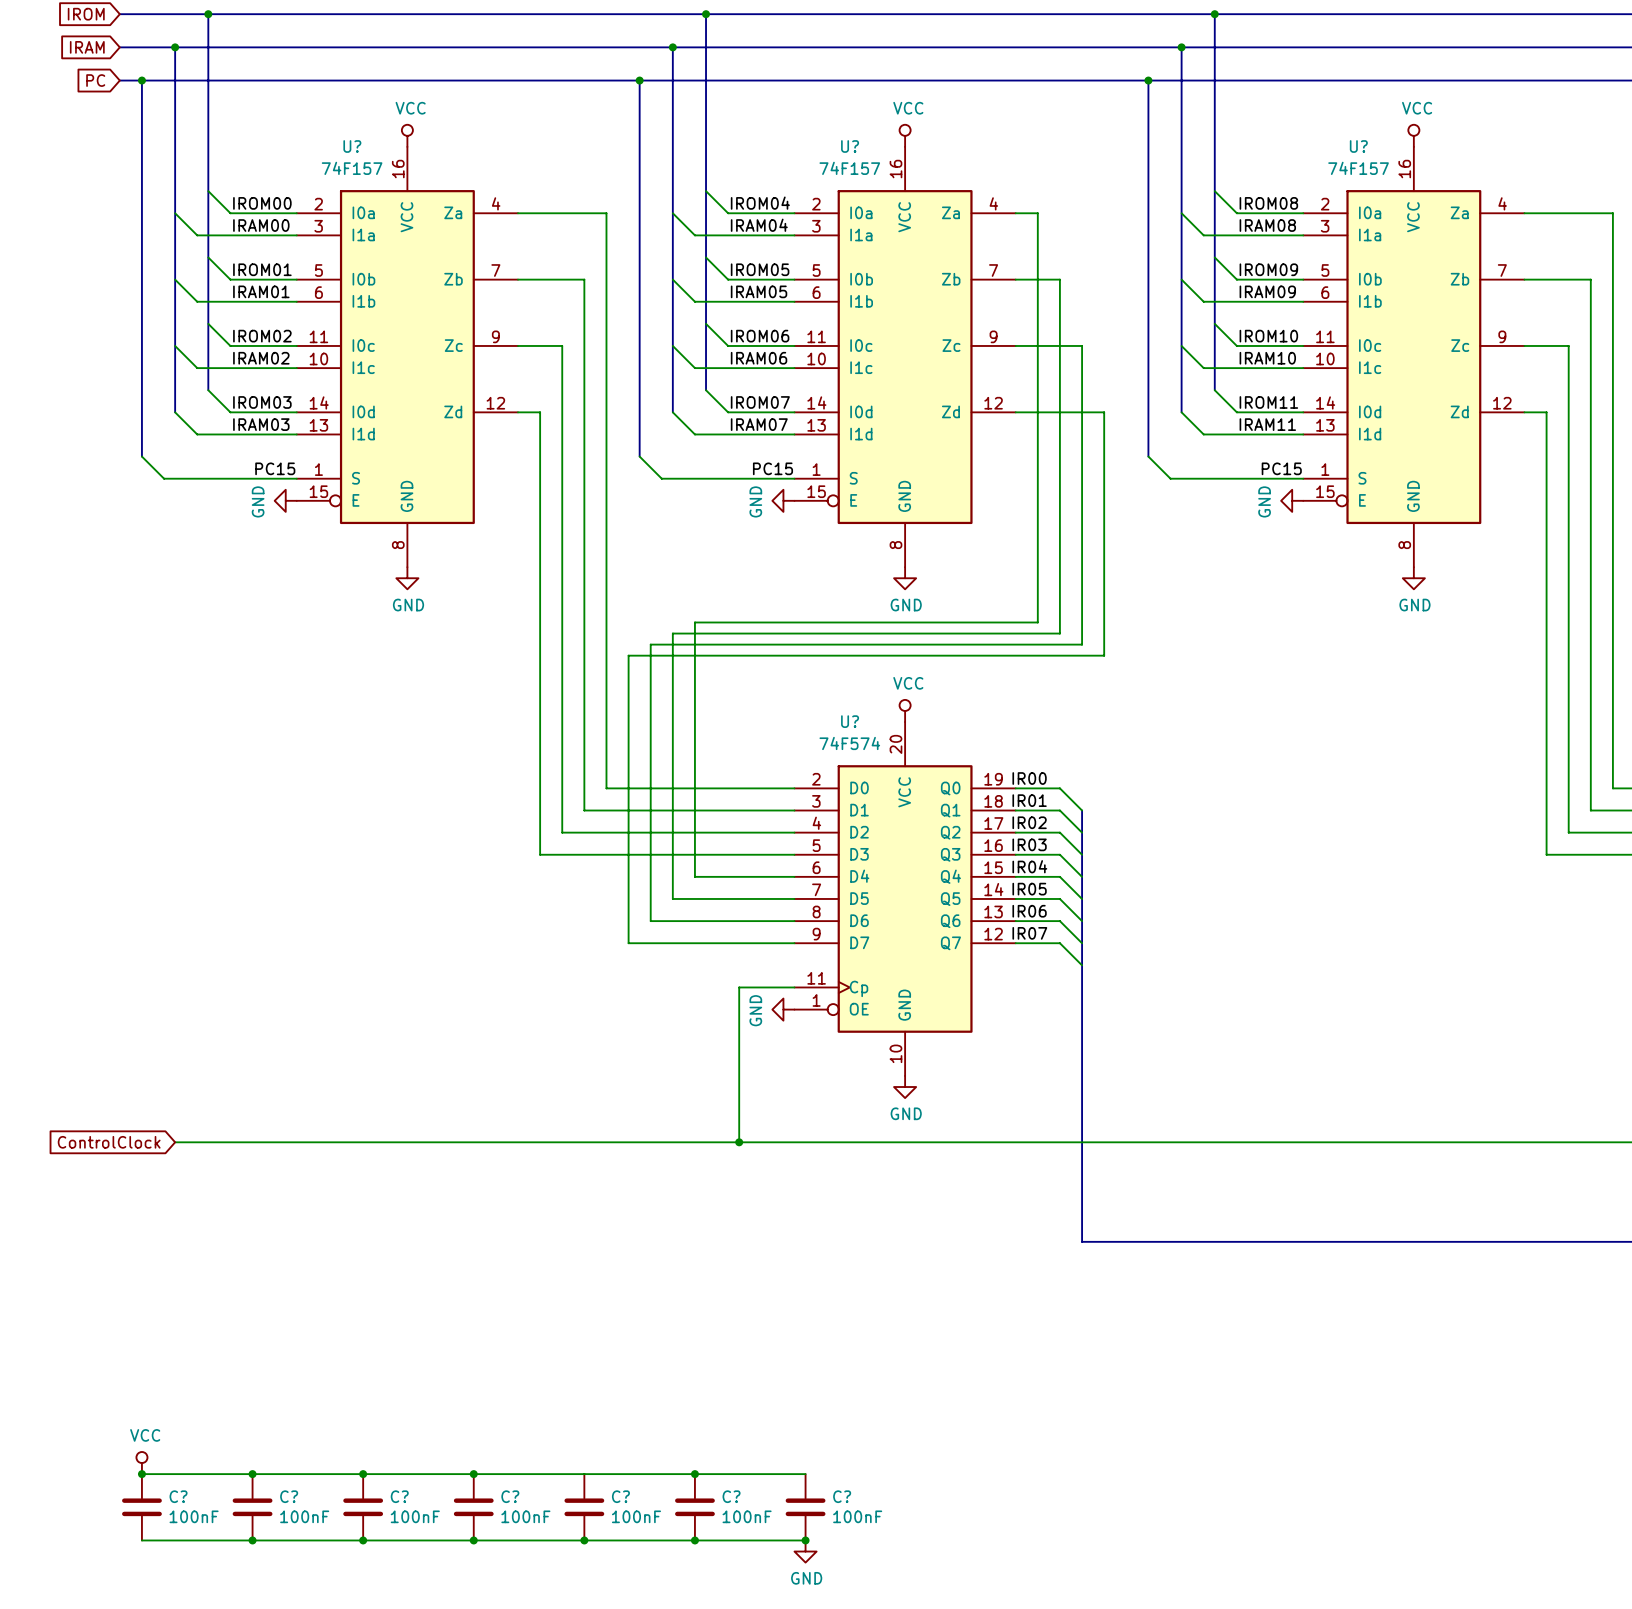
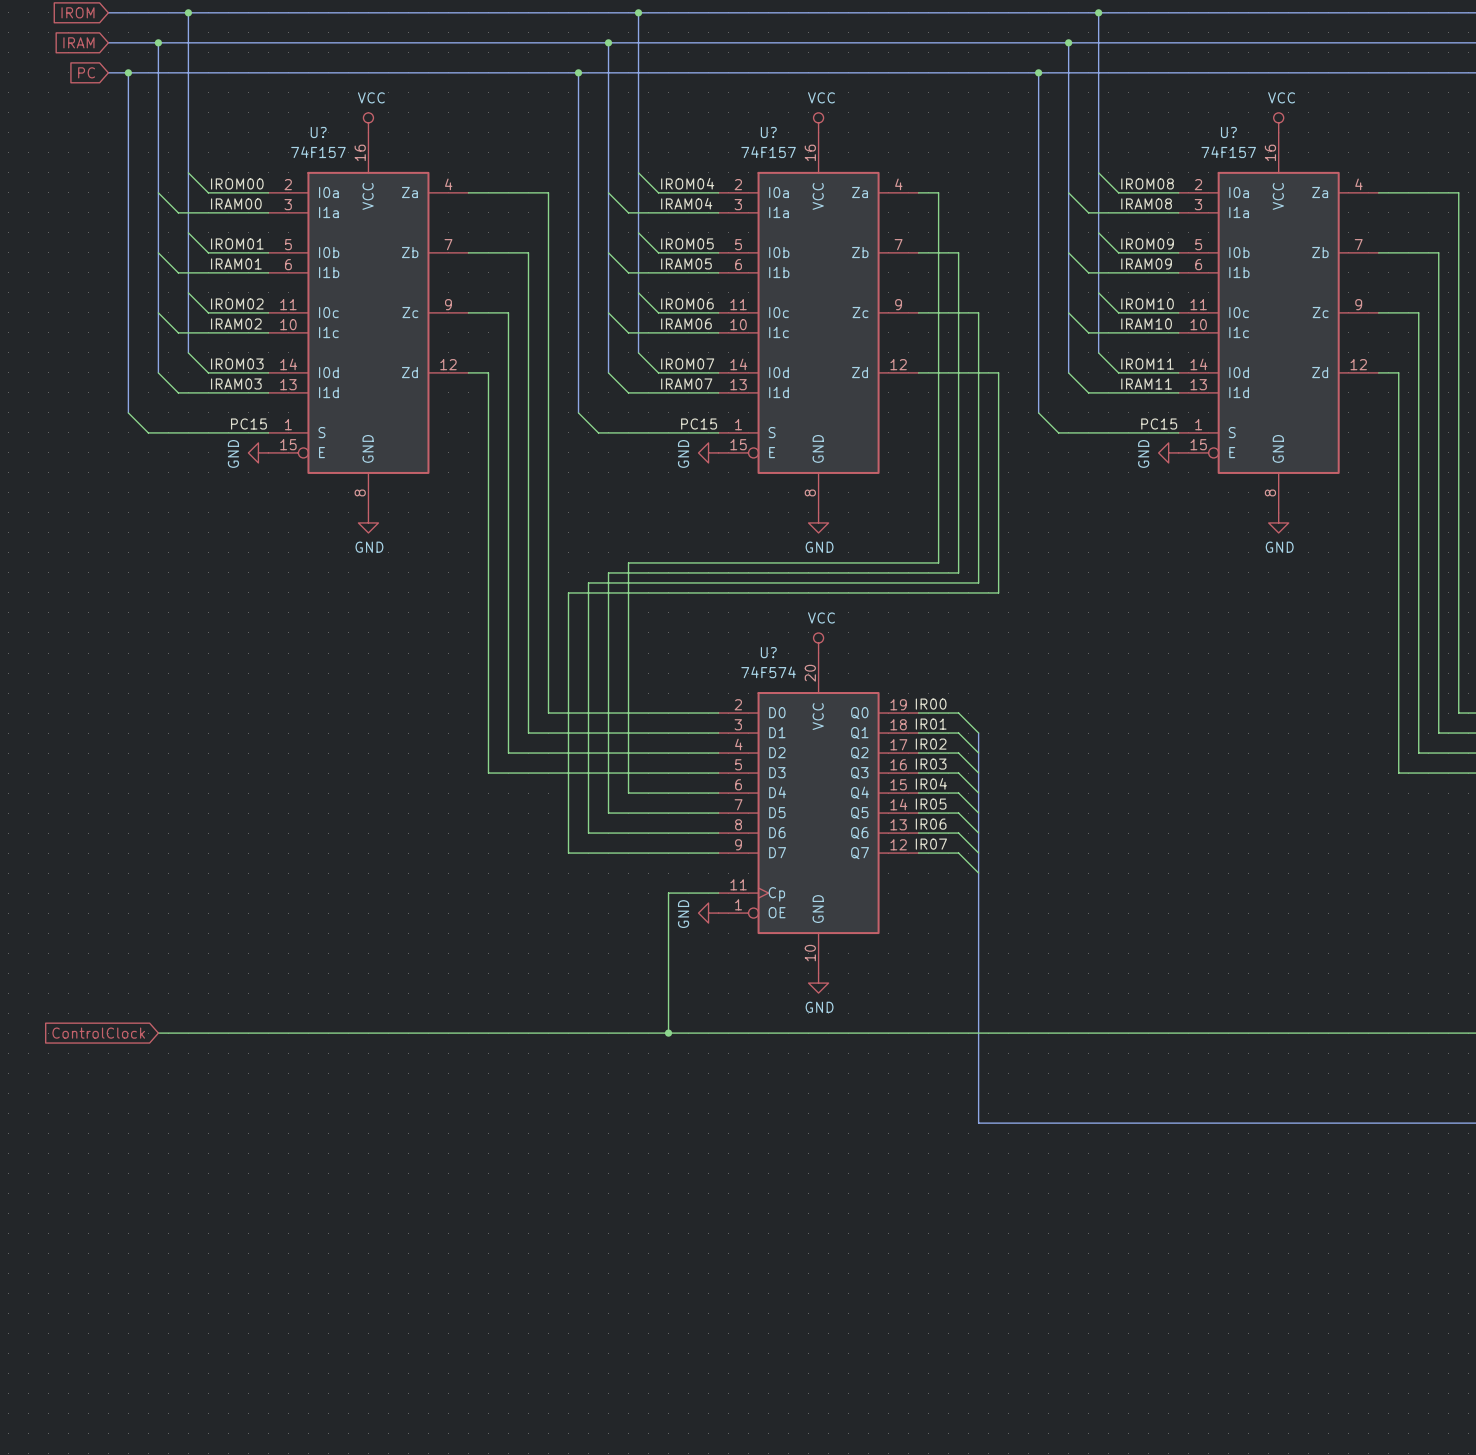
power symbol: VCC (141, 1463) -> none
wire: (141, 1474) (805, 1474) -> none
junction: (141, 1474) -> none
junction: (252, 1474) -> none
junction: (363, 1474) -> none
junction: (473, 1474) -> none
junction: (694, 1474) -> none
C?: 100nF (141, 1507) -> none
C?: 100nF (252, 1507) -> none
C?: 100nF (363, 1507) -> none
C?: 100nF (473, 1507) -> none
C?: 100nF (584, 1507) -> none
C?: 100nF (694, 1507) -> none
C?: 100nF (805, 1507) -> none
wire: (141, 1540) (805, 1540) -> none
junction: (252, 1540) -> none
junction: (363, 1540) -> none
junction: (473, 1540) -> none
junction: (584, 1540) -> none
junction: (694, 1540) -> none
junction: (805, 1540) -> none
power symbol: GND (805, 1551) -> none

